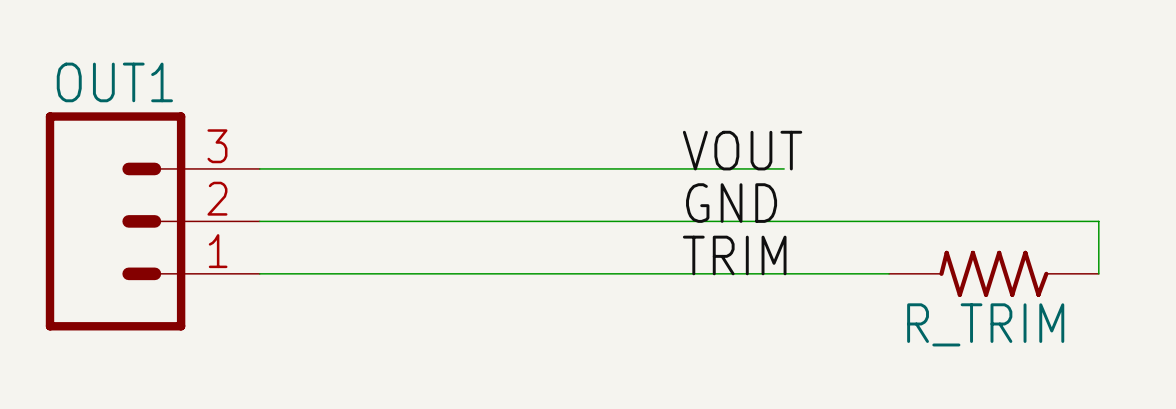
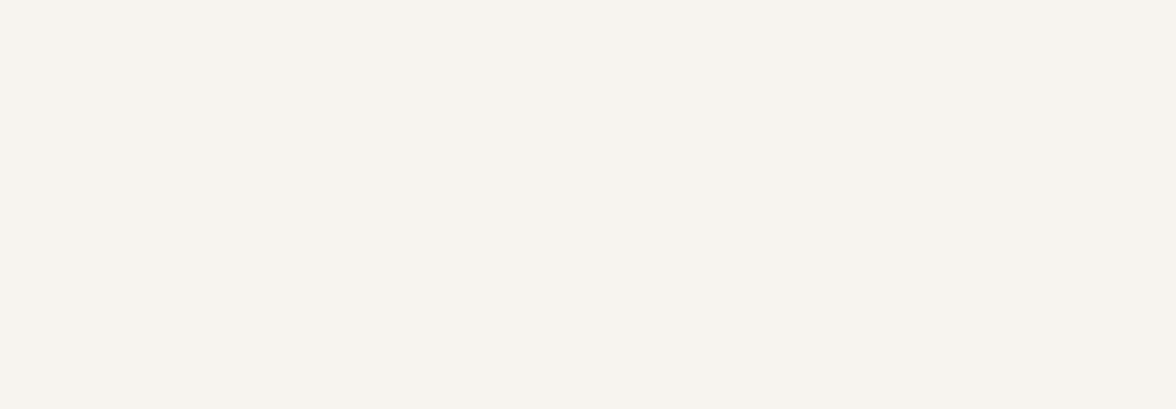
label: VOUT (742, 150) -> none
wire: (259, 168) (784, 168) -> none
label: GND (731, 203) -> none
OUT1: (152, 221) -> none
wire: (259, 221) (1098, 221) (1098, 273) -> none
label: TRIM (734, 255) -> none
wire: (259, 273) (889, 273) -> none
R_TRIM: (993, 273) -> none

